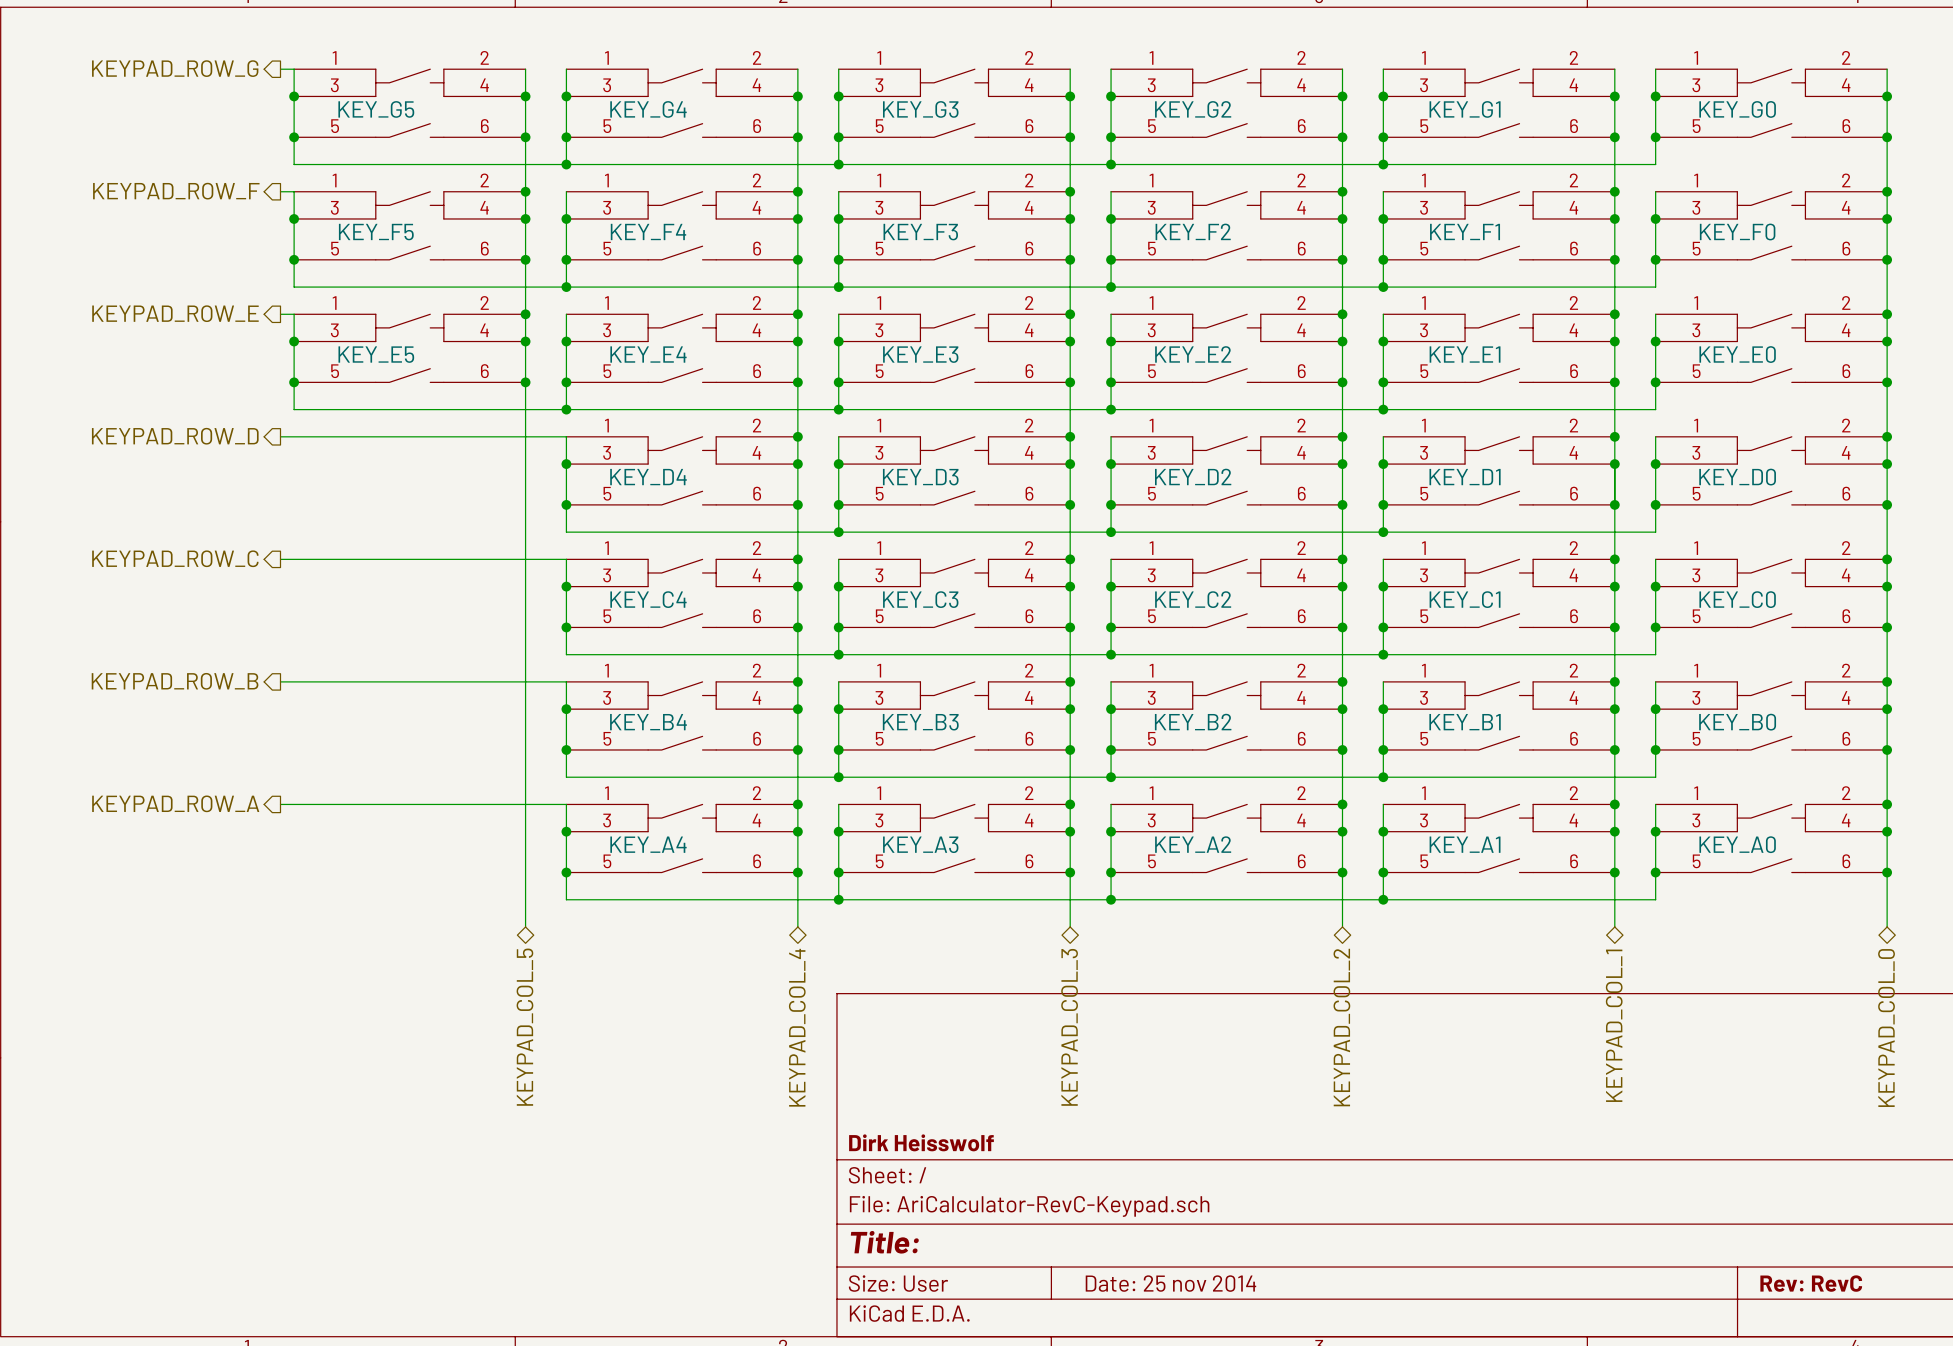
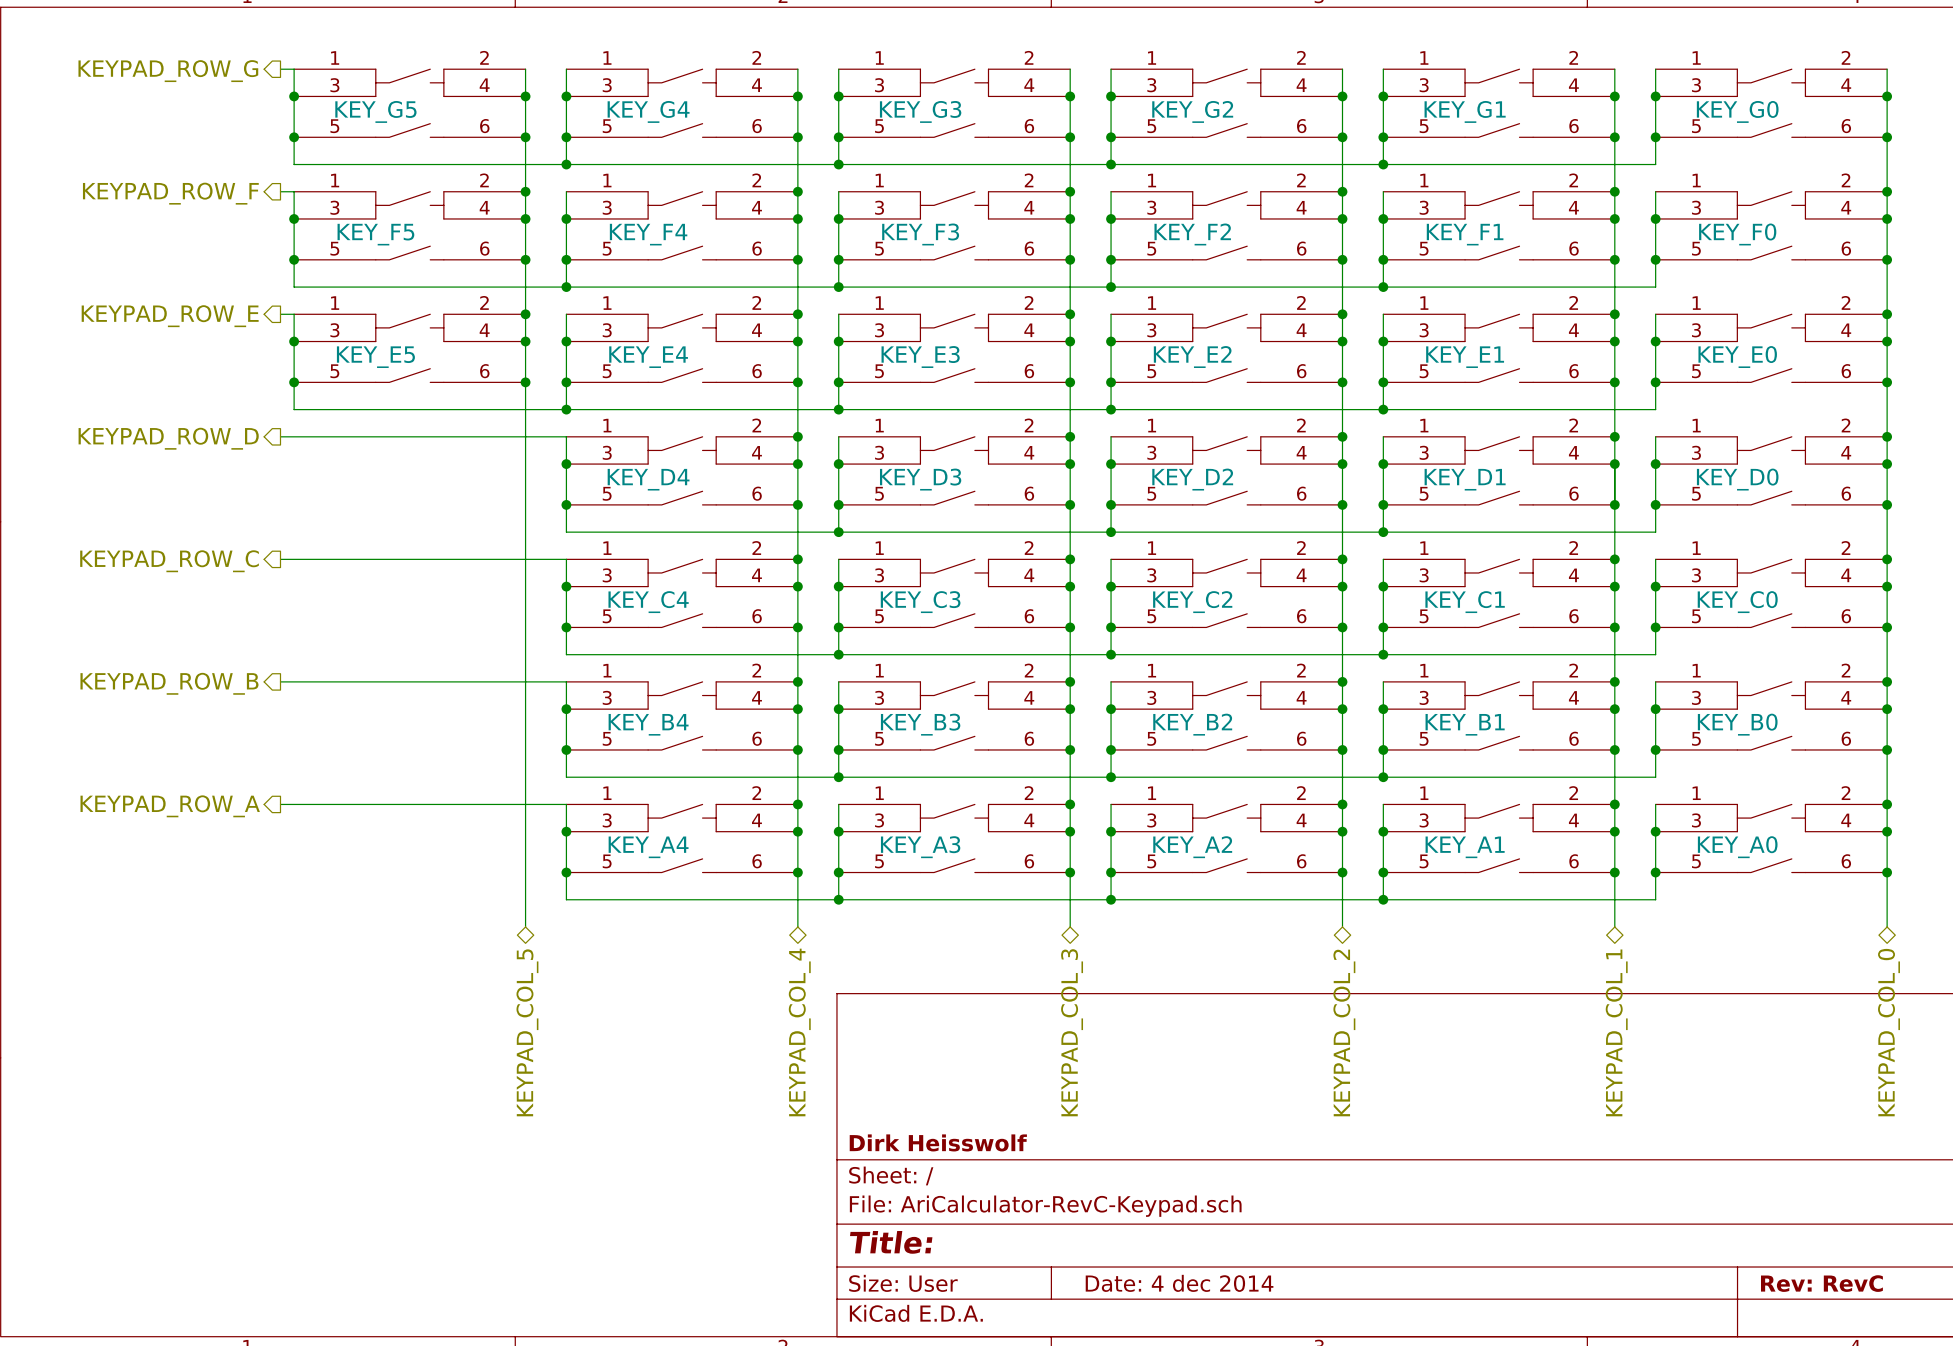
title block: Date: 25 nov 2014 (1170, 1283) -> Date: 4 dec 2014 (1179, 1283)

